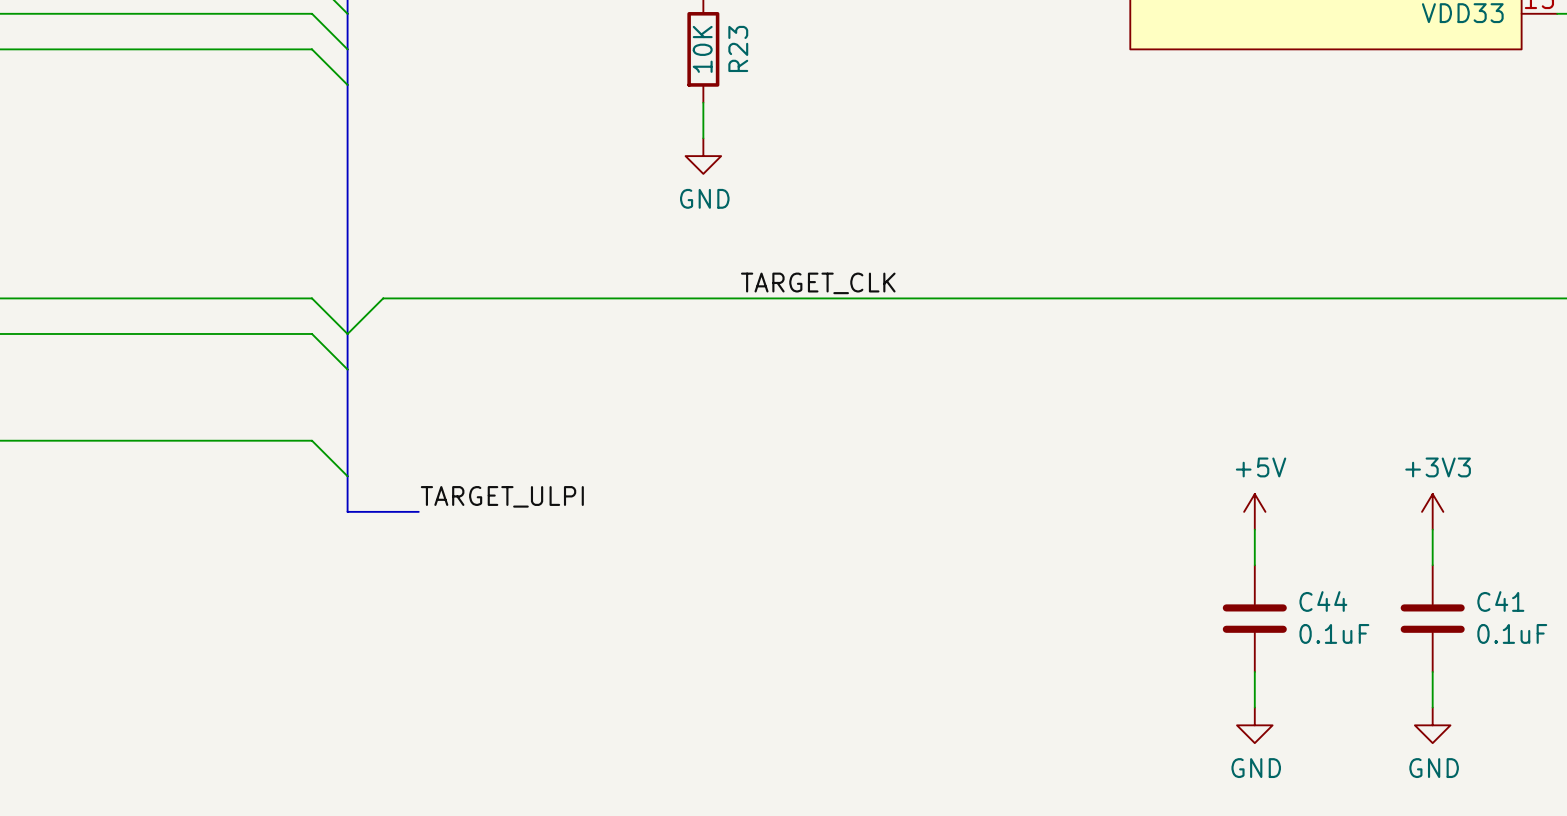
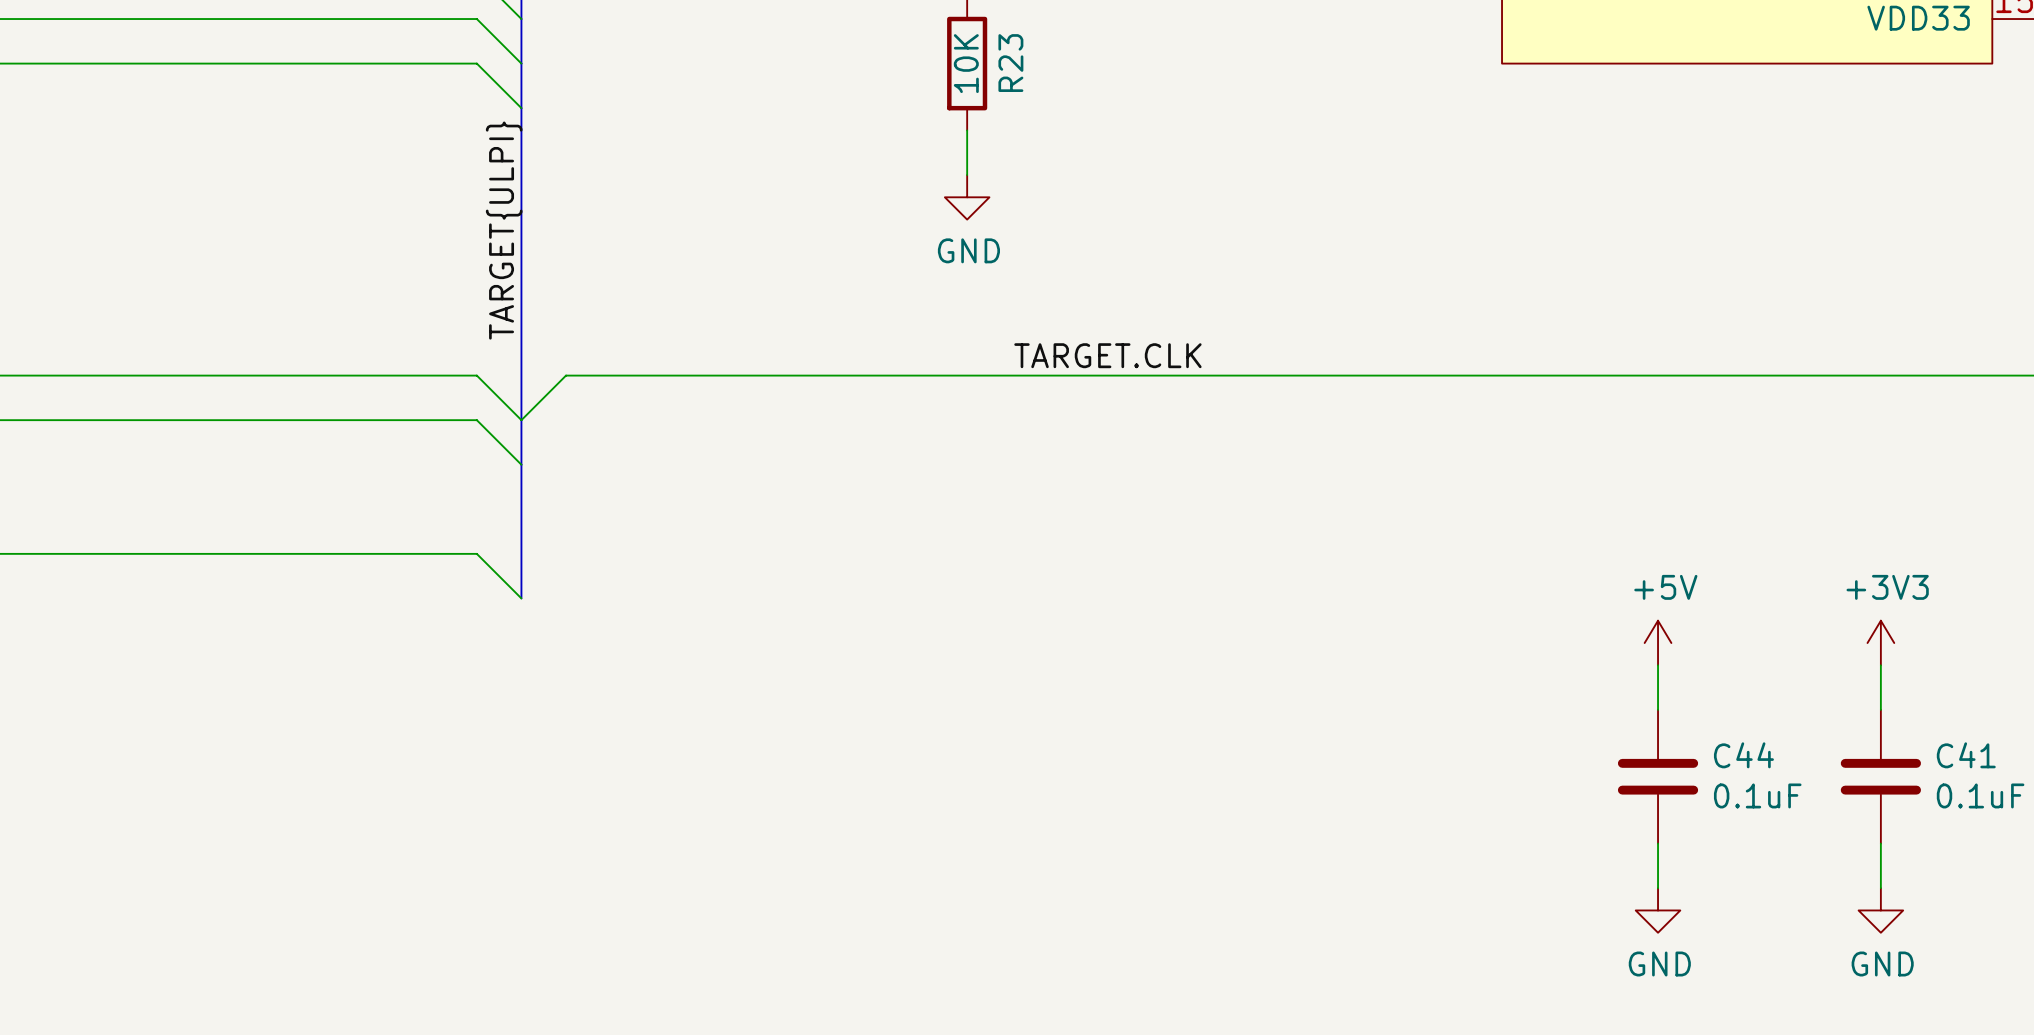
label: none -> TARGET{ULPI} (504, 230)
label: TARGET_CLK (818, 283) -> TARGET.CLK (1107, 355)
bus: (347, 476) (347, 511) (418, 511) -> none
label: TARGET_ULPI (502, 496) -> none

